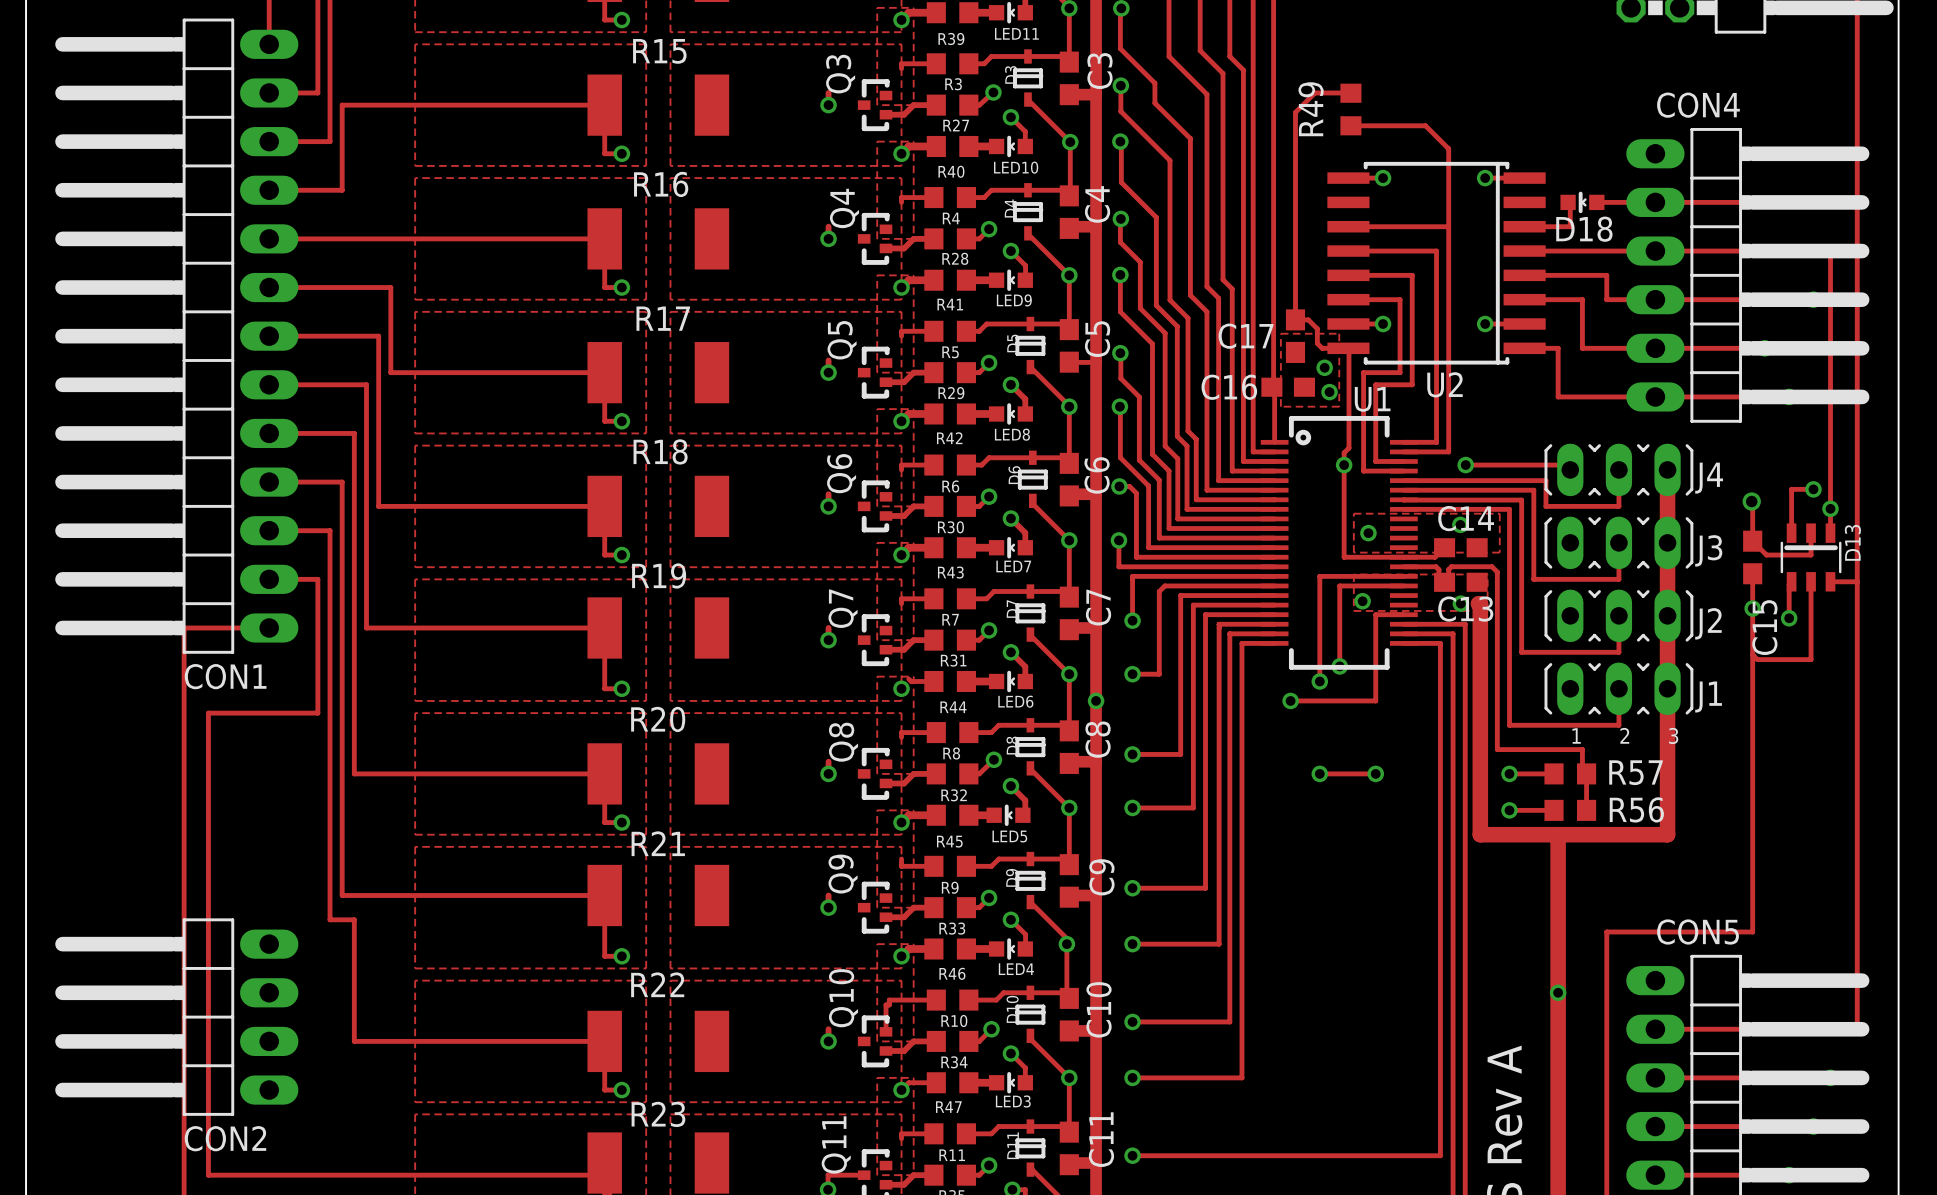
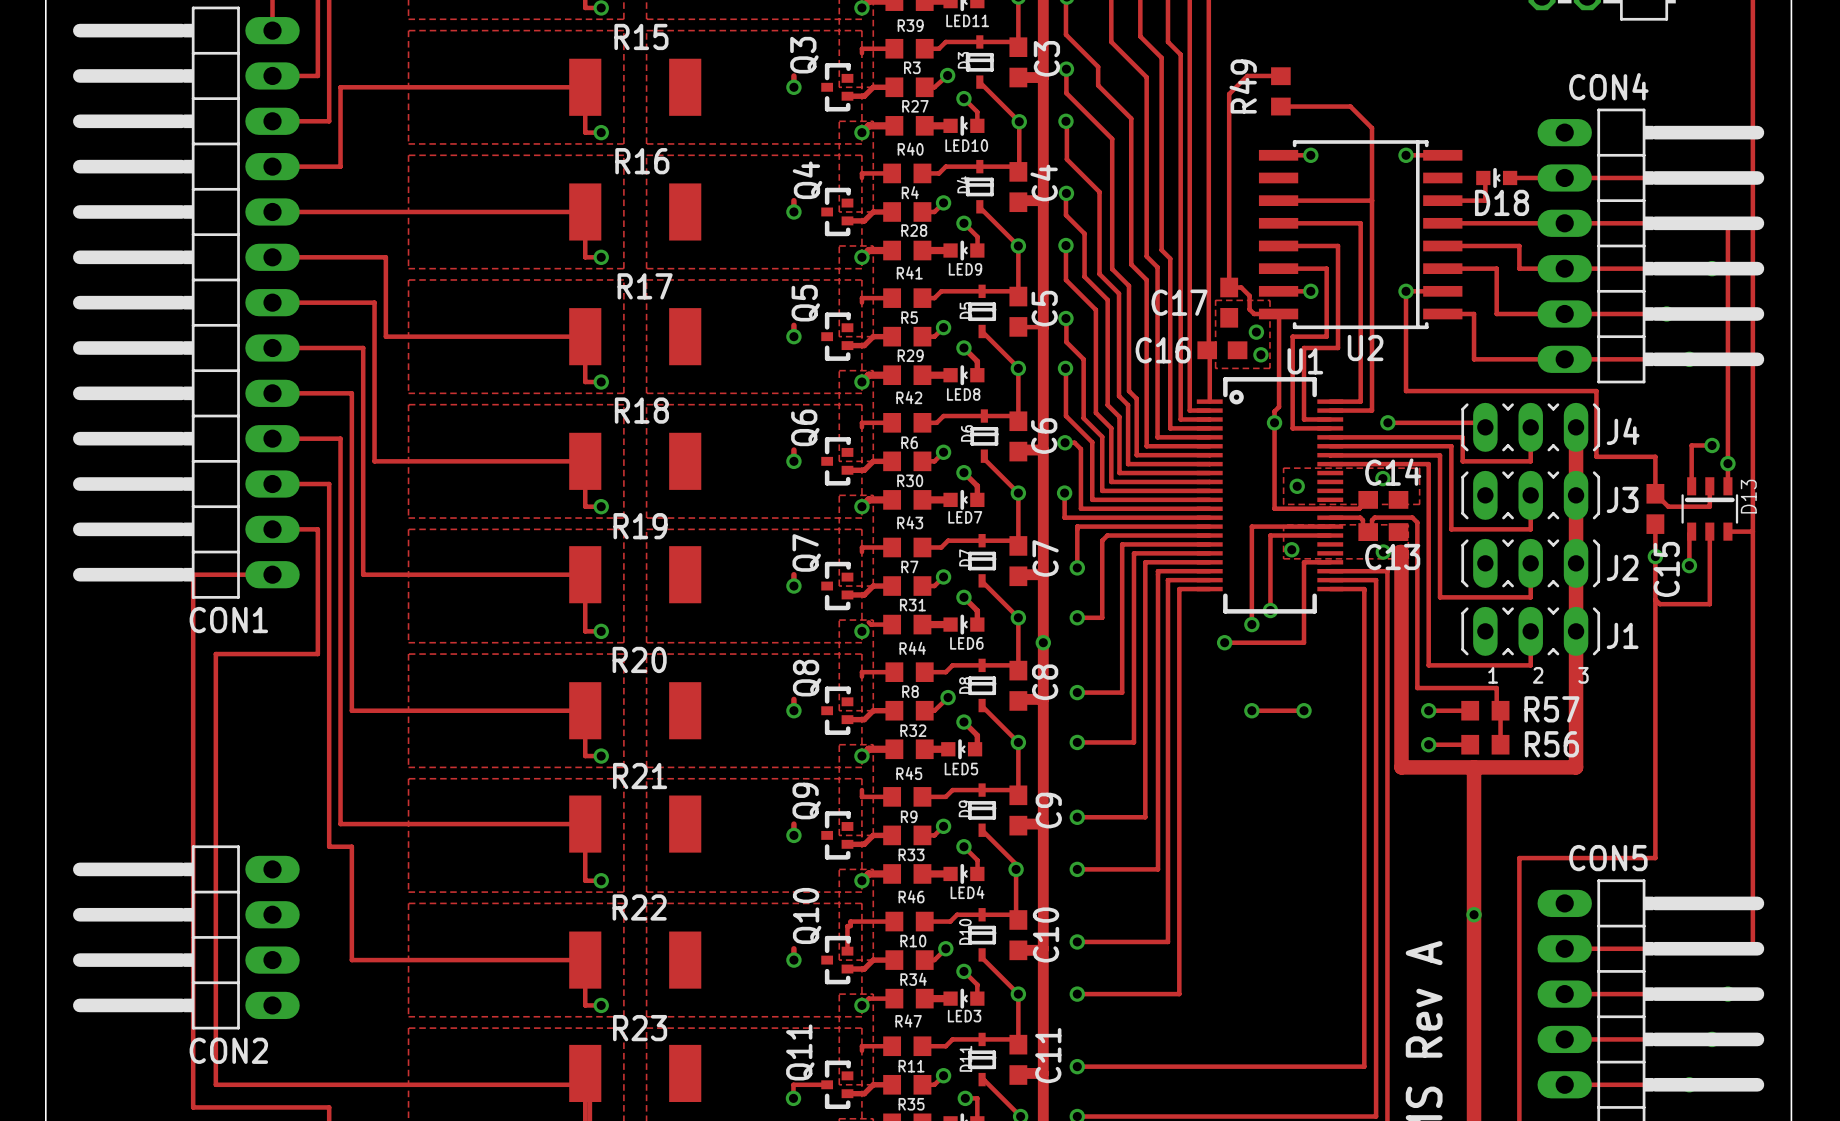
track: none -> (1406, 291) (1406, 391) (1596, 391) (1596, 456) (1654, 456)
via: (1751, 501) -> none

